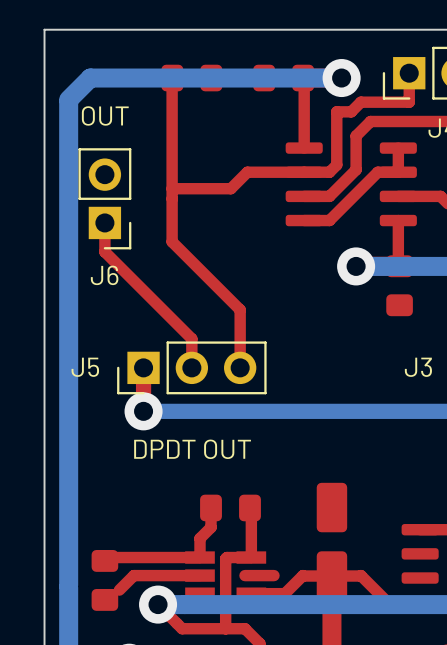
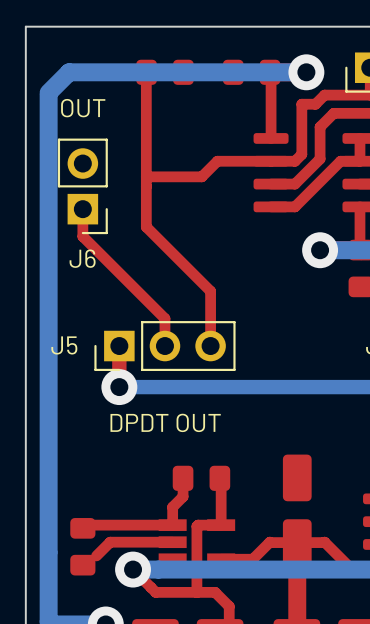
top track: (273, 575) (245, 575) -> none

